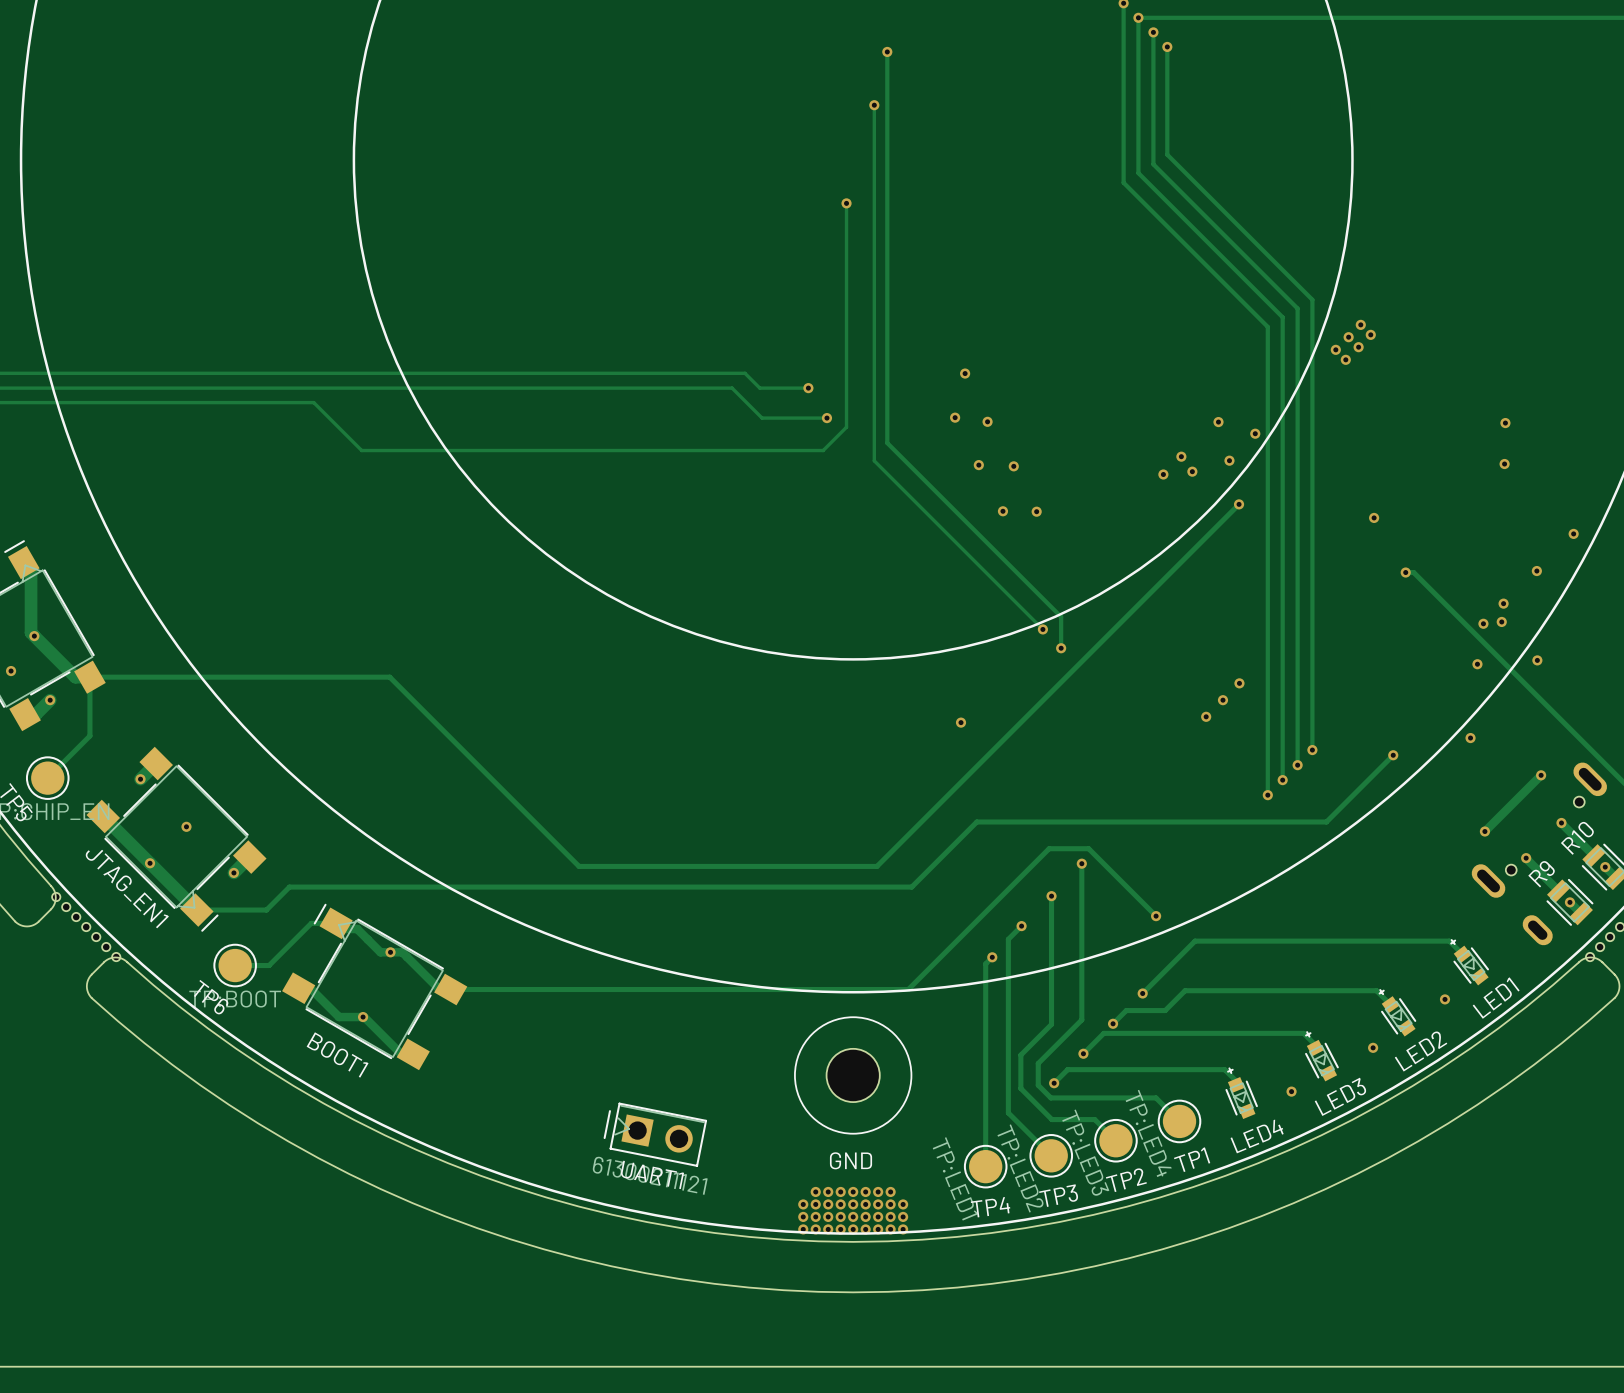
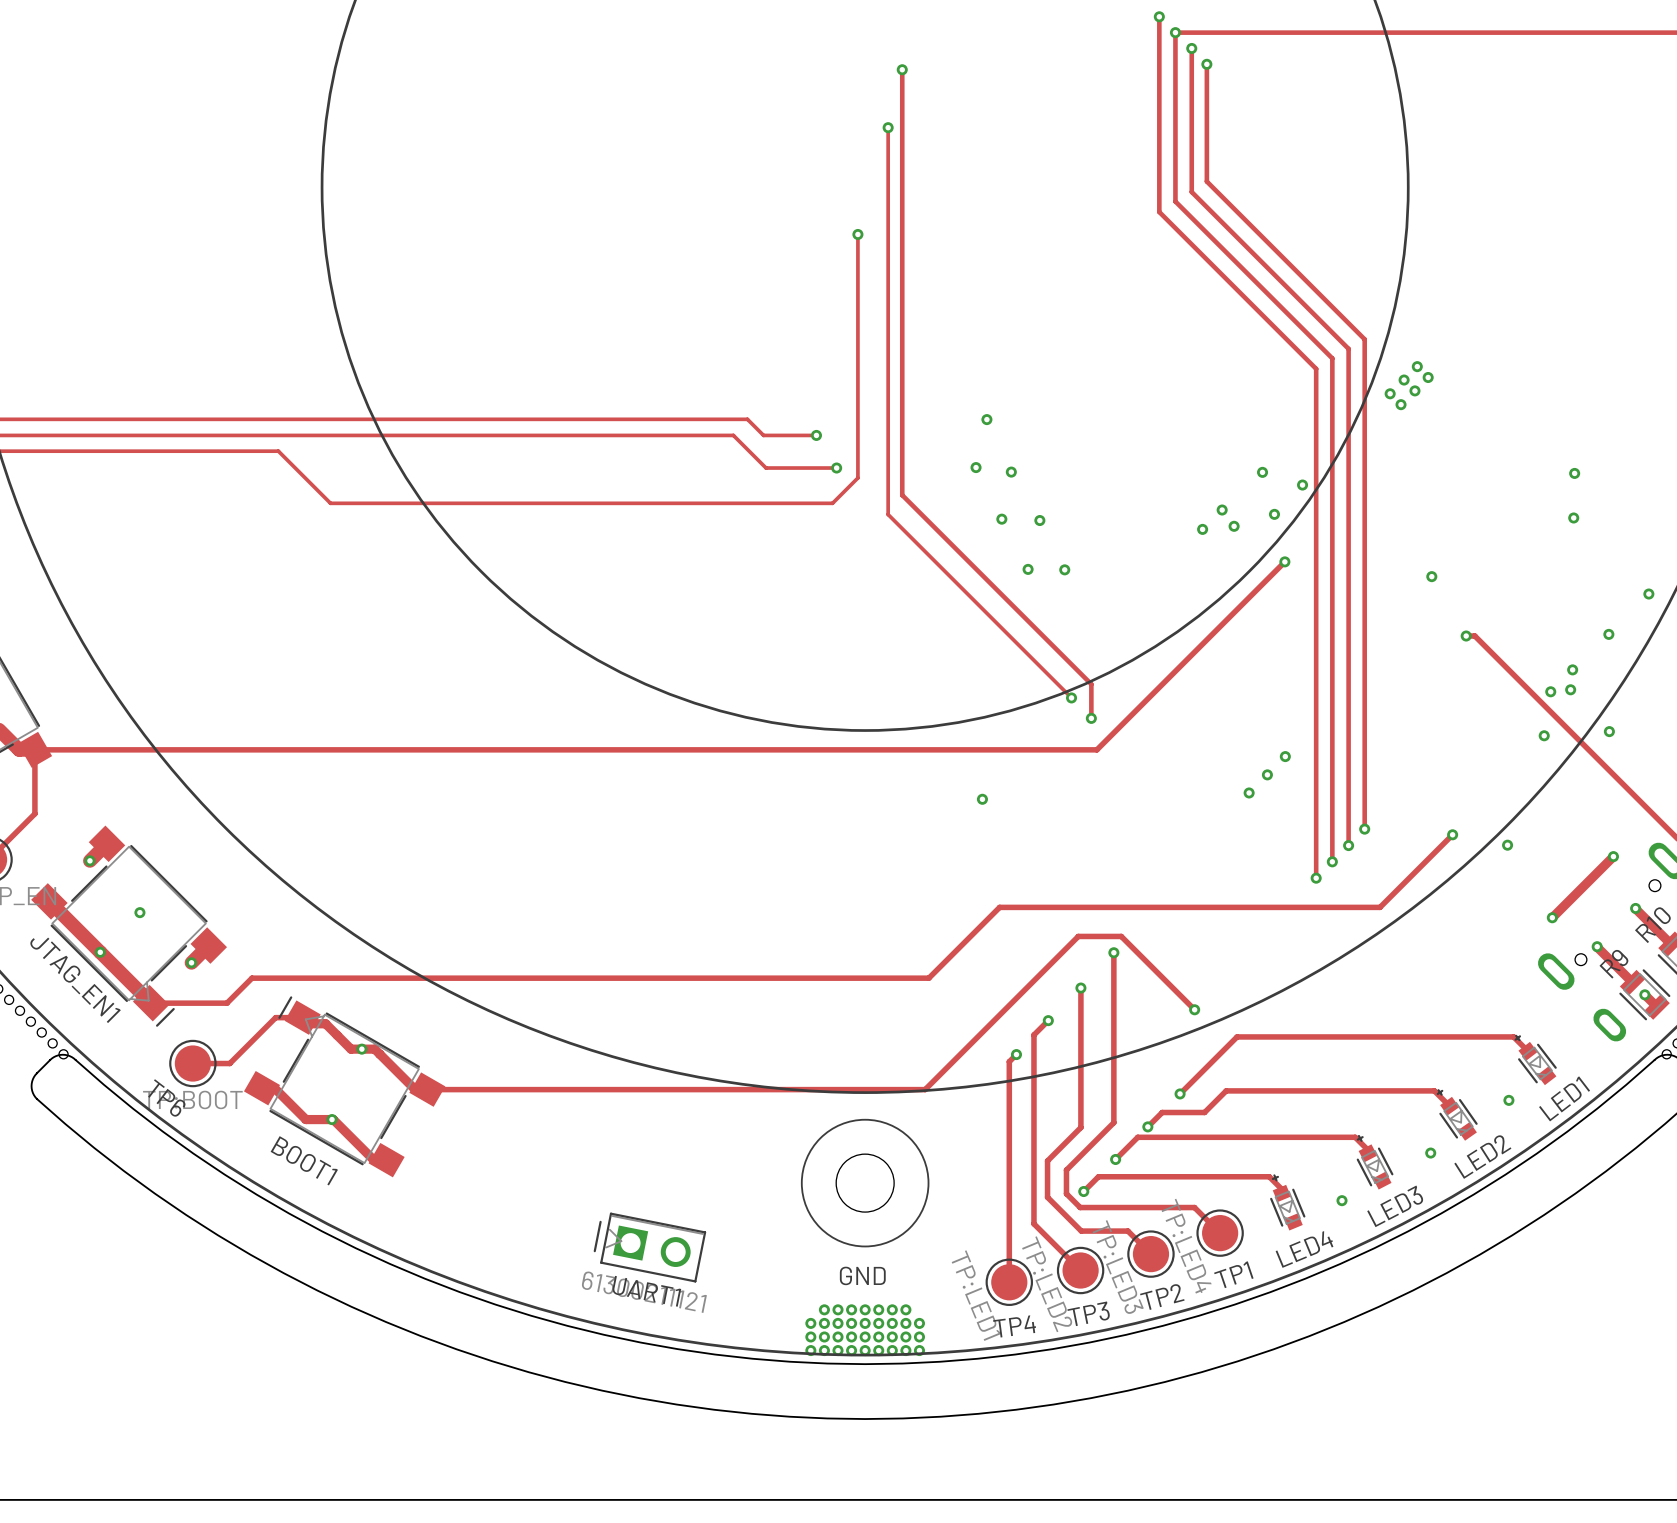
track: (389, 677) (579, 866) (876, 866) (1066, 677) -> (361, 749) (1096, 749)
via position: (1470, 738) -> (1507, 845)

